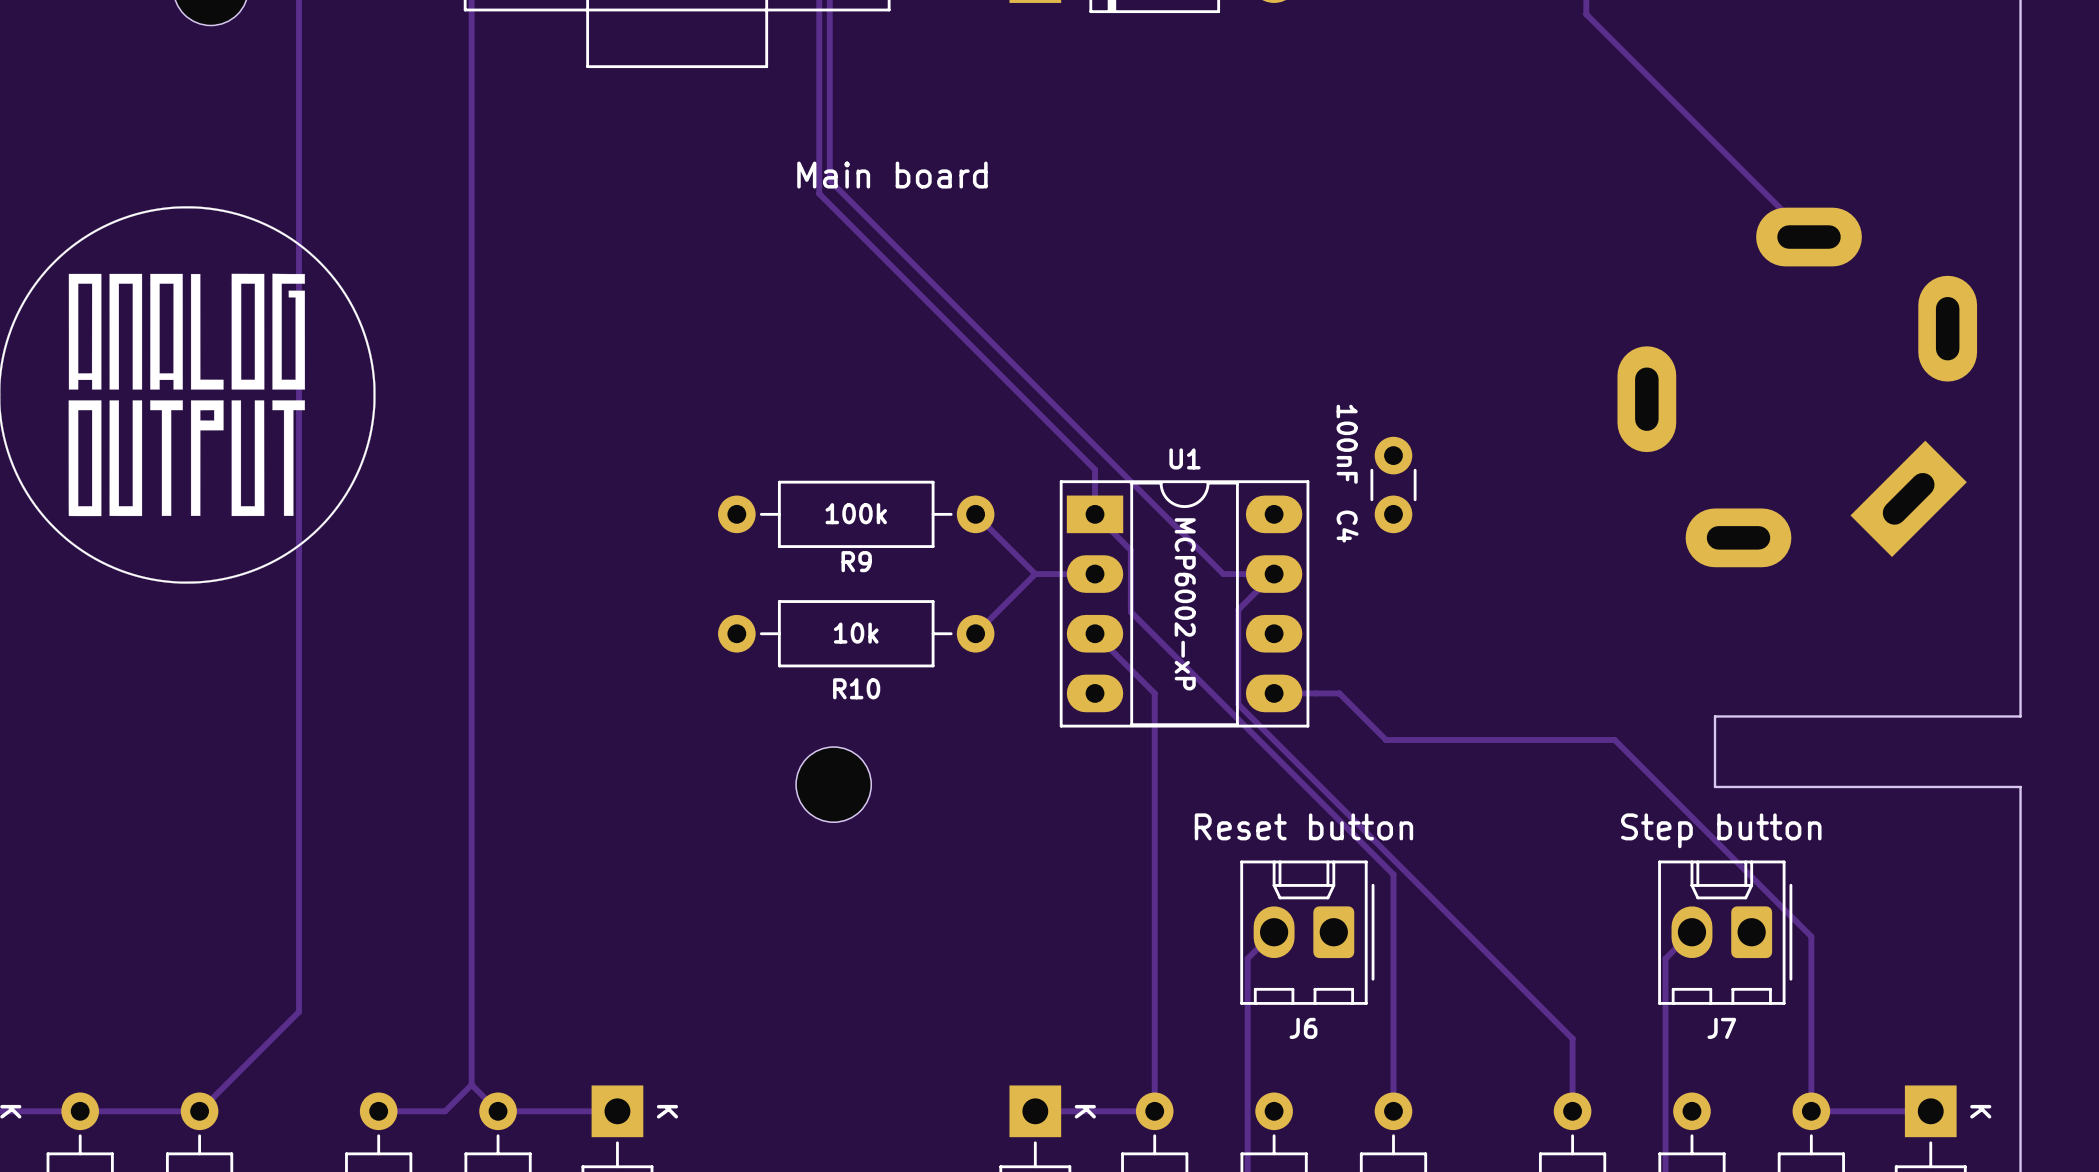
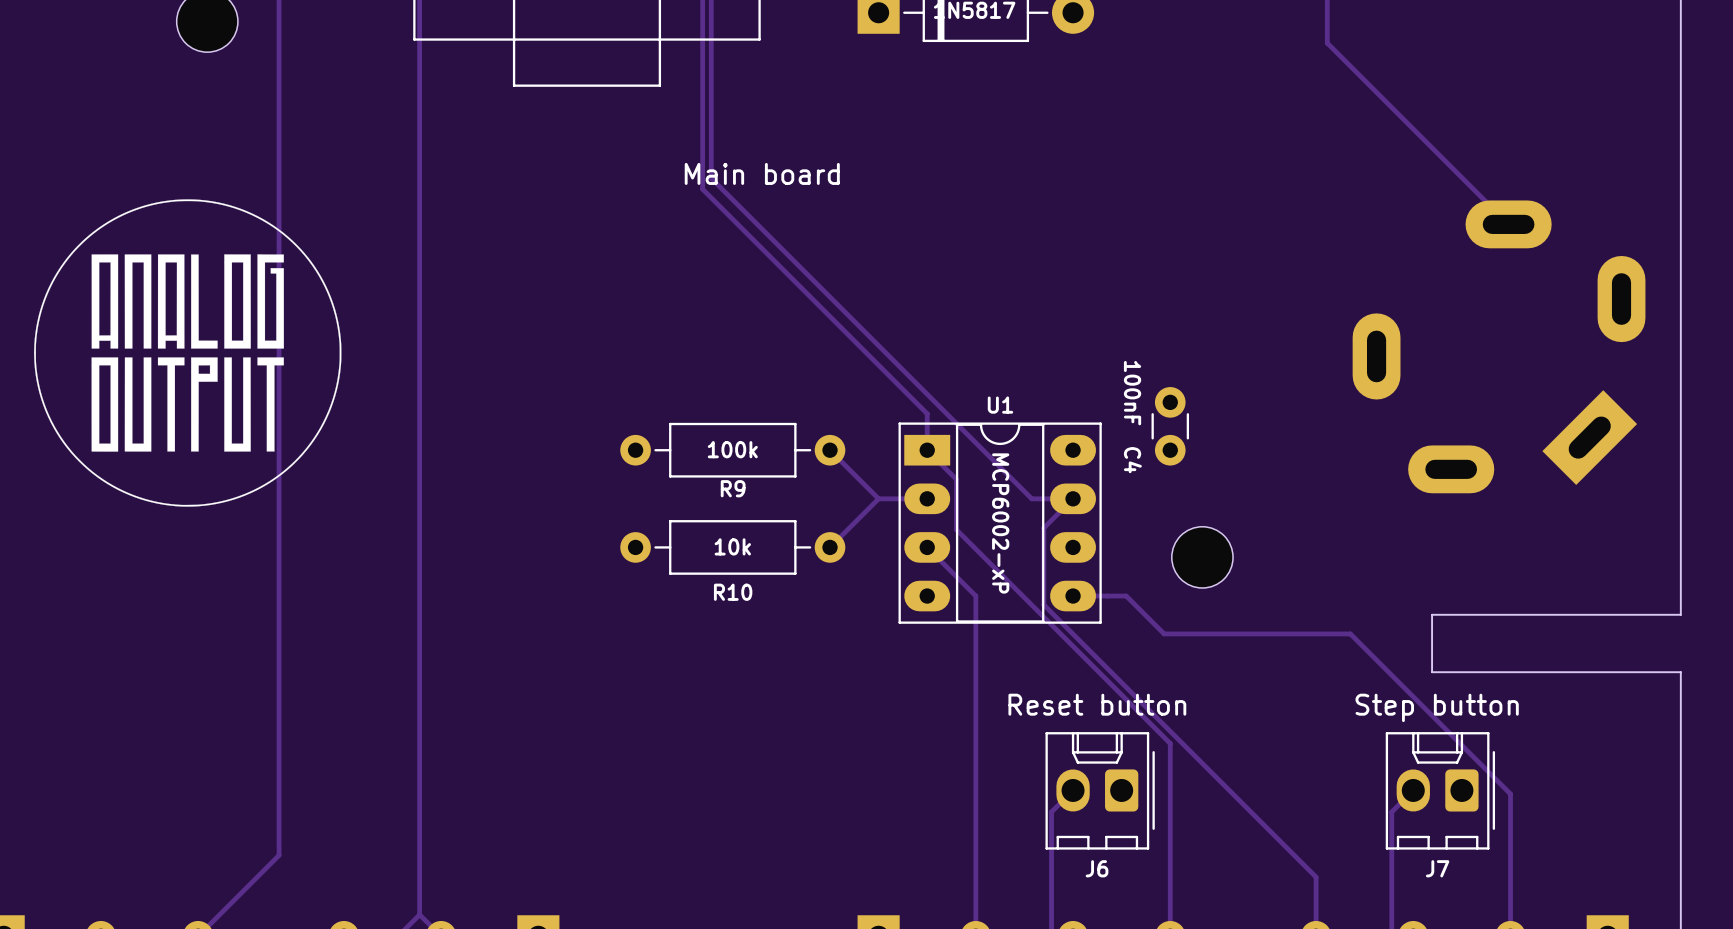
part: none -> (1202, 557)
part: (833, 784) -> none

